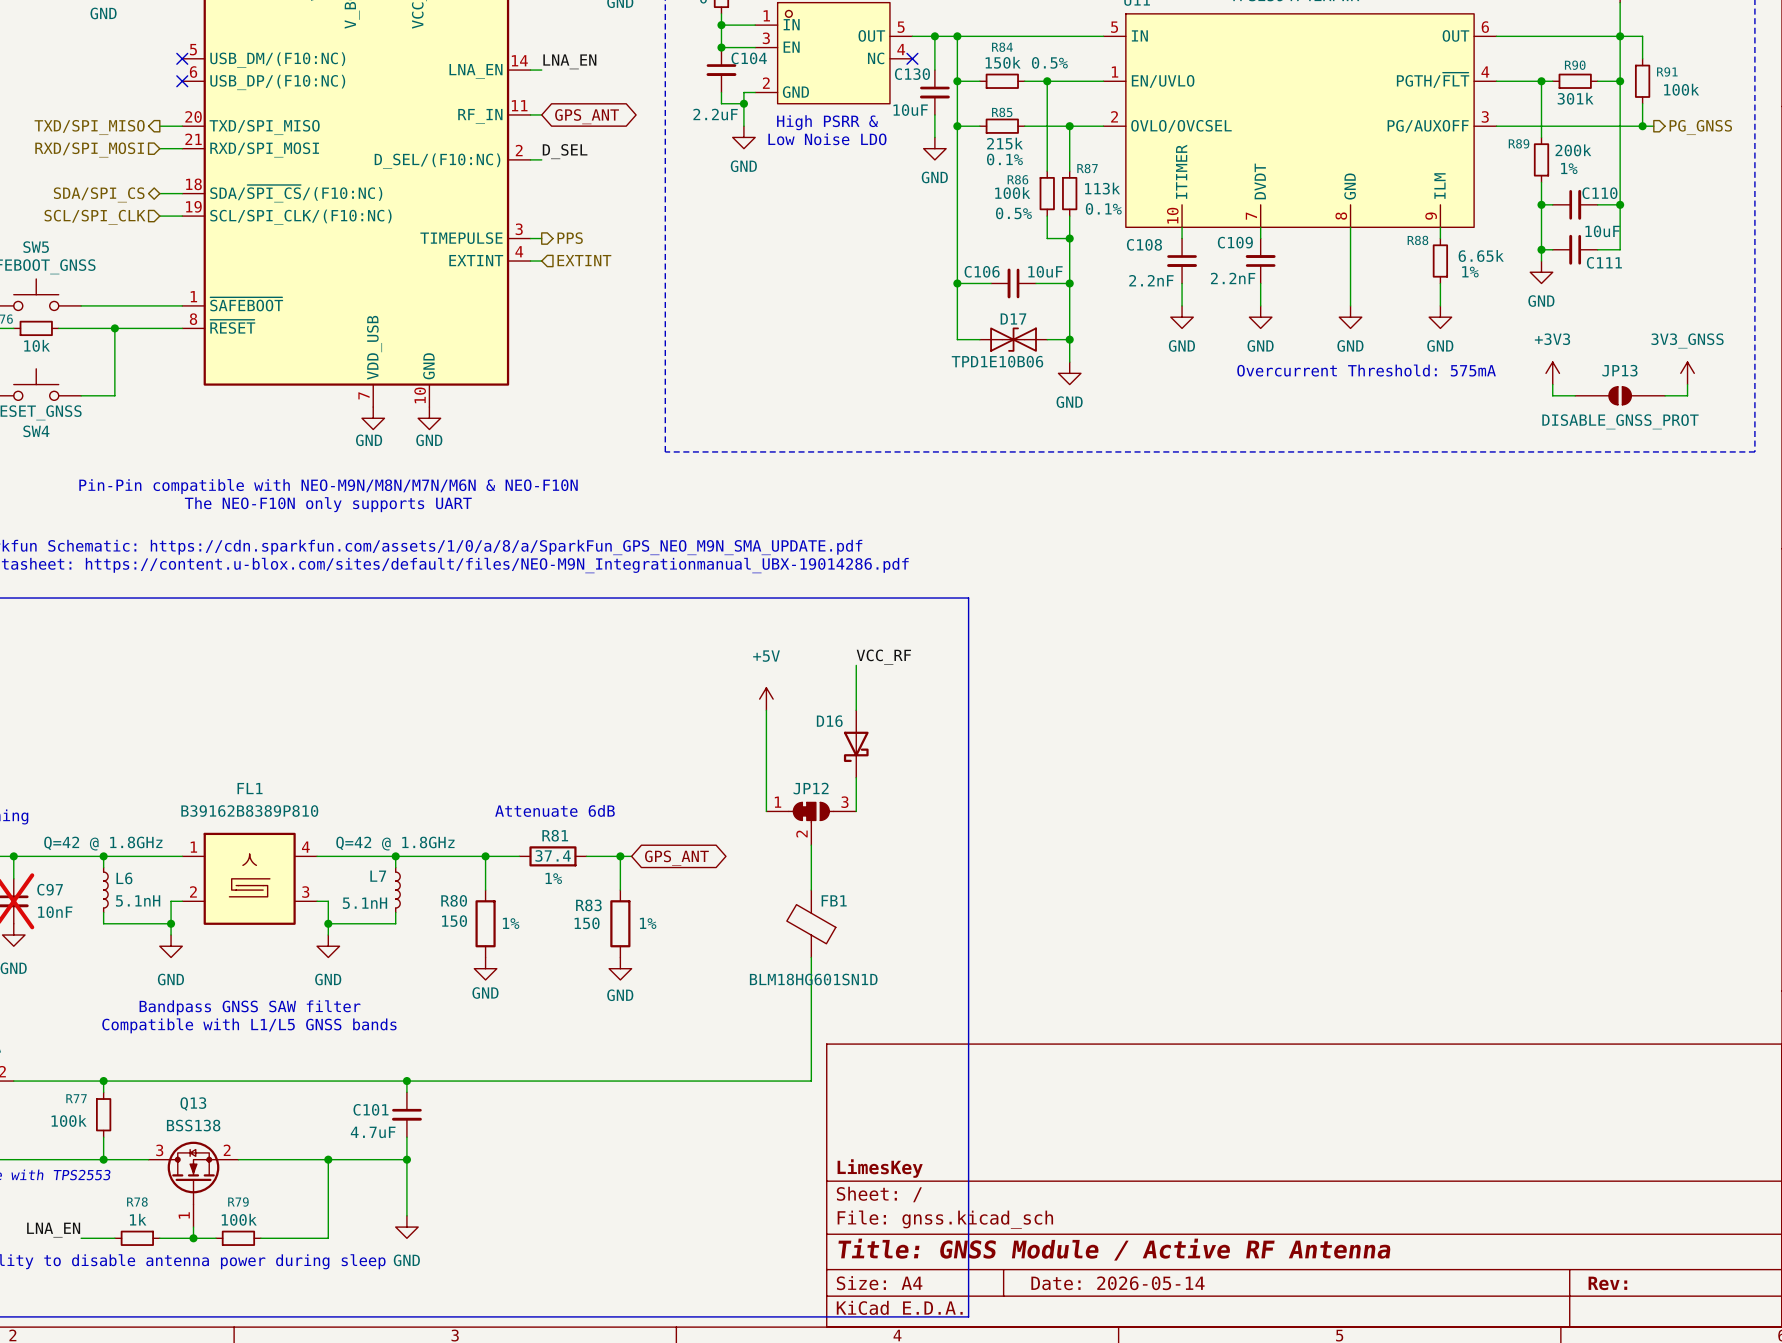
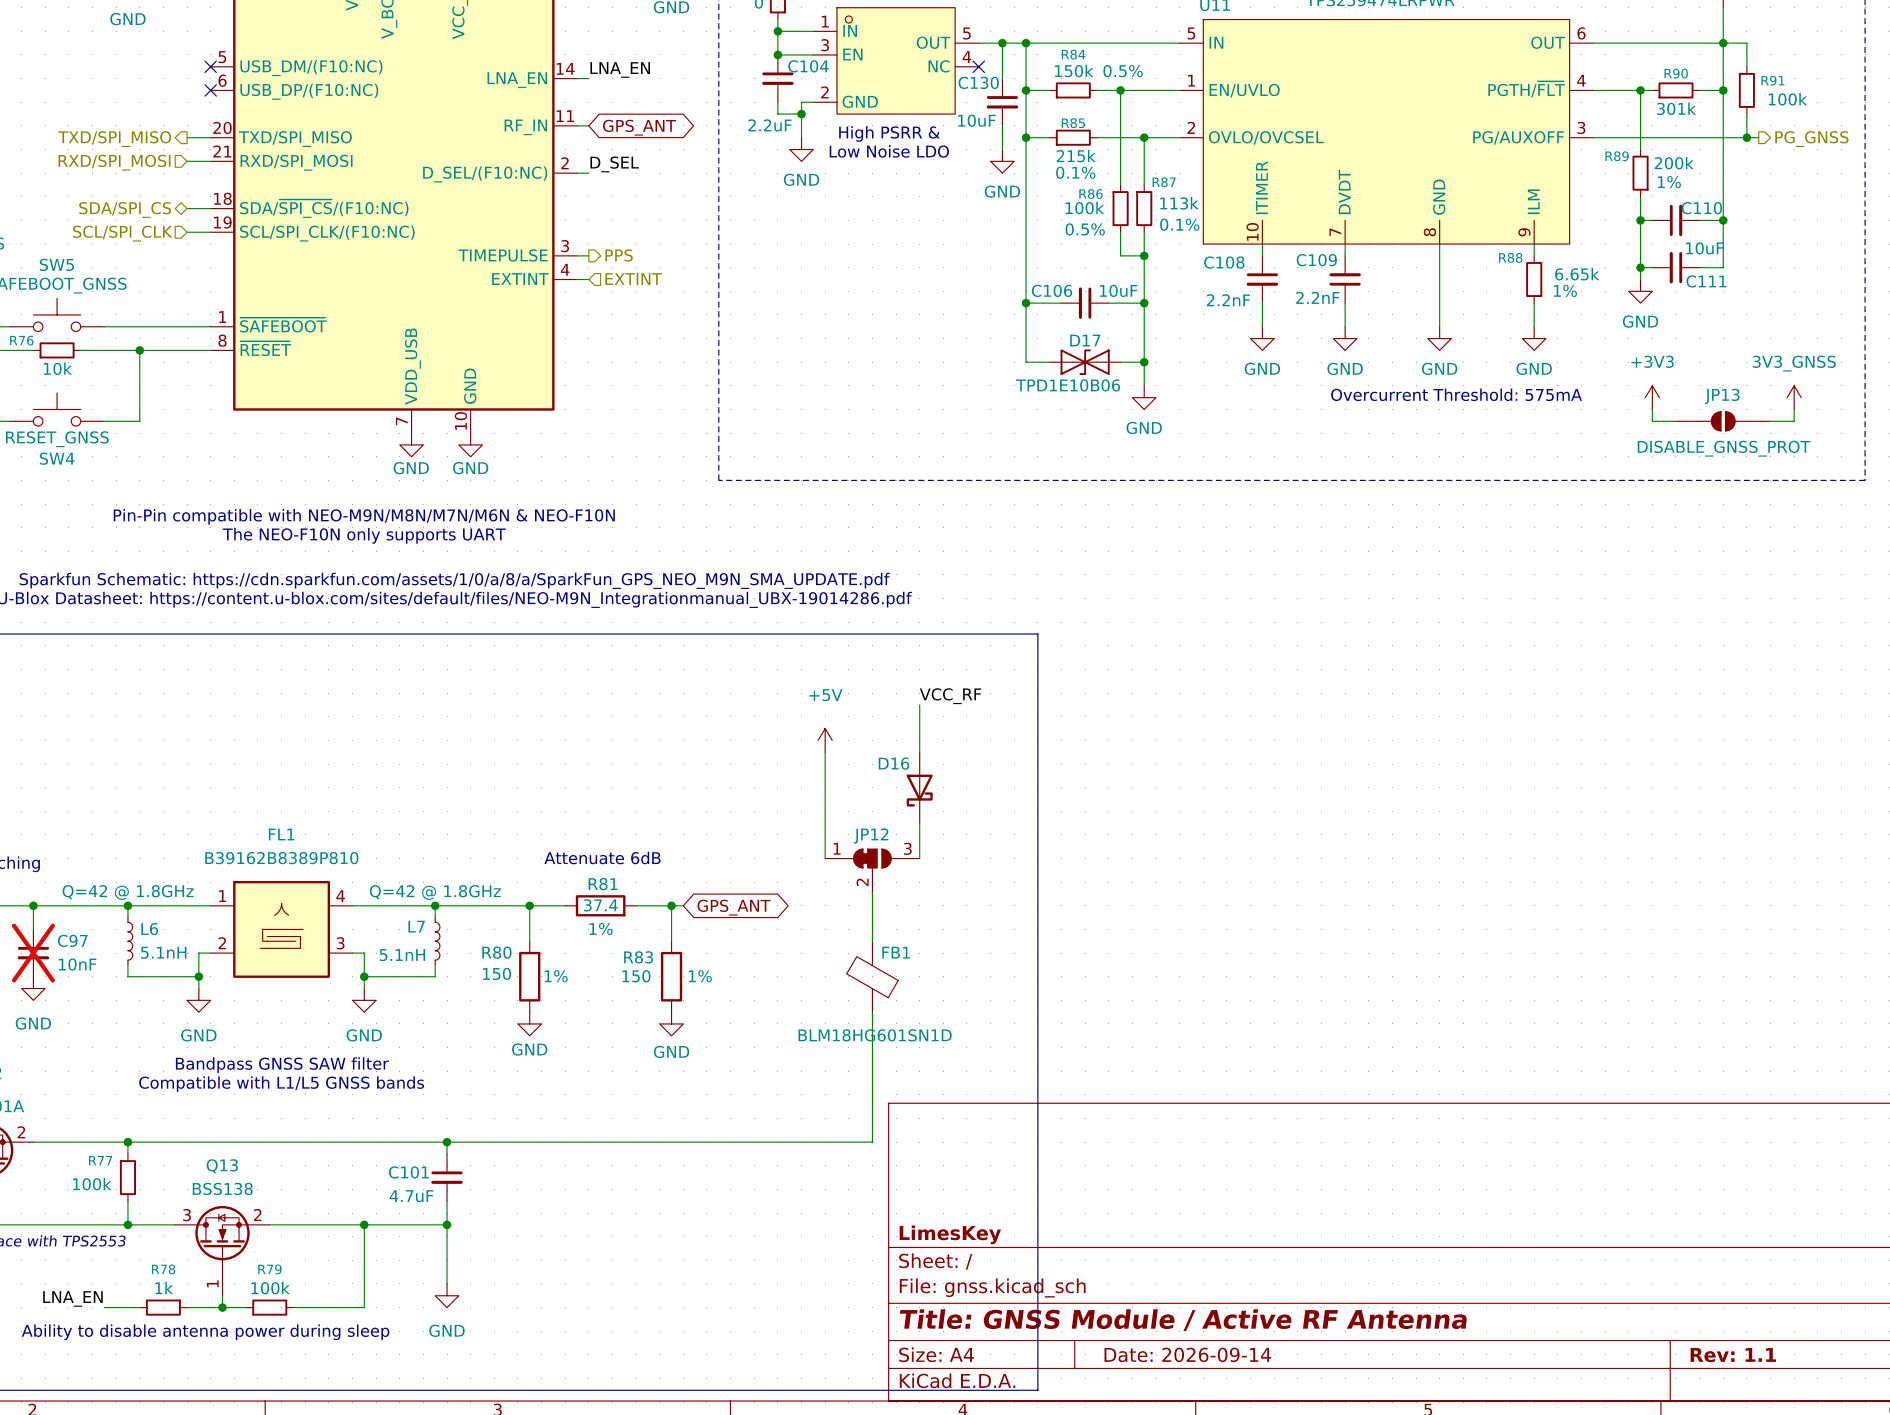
title block: Date: 2026-05-14 (1117, 1283) -> Date: 2026-09-14 (1187, 1354)
title block: Rev: (1607, 1283) -> Rev: 1.1 (1733, 1355)

